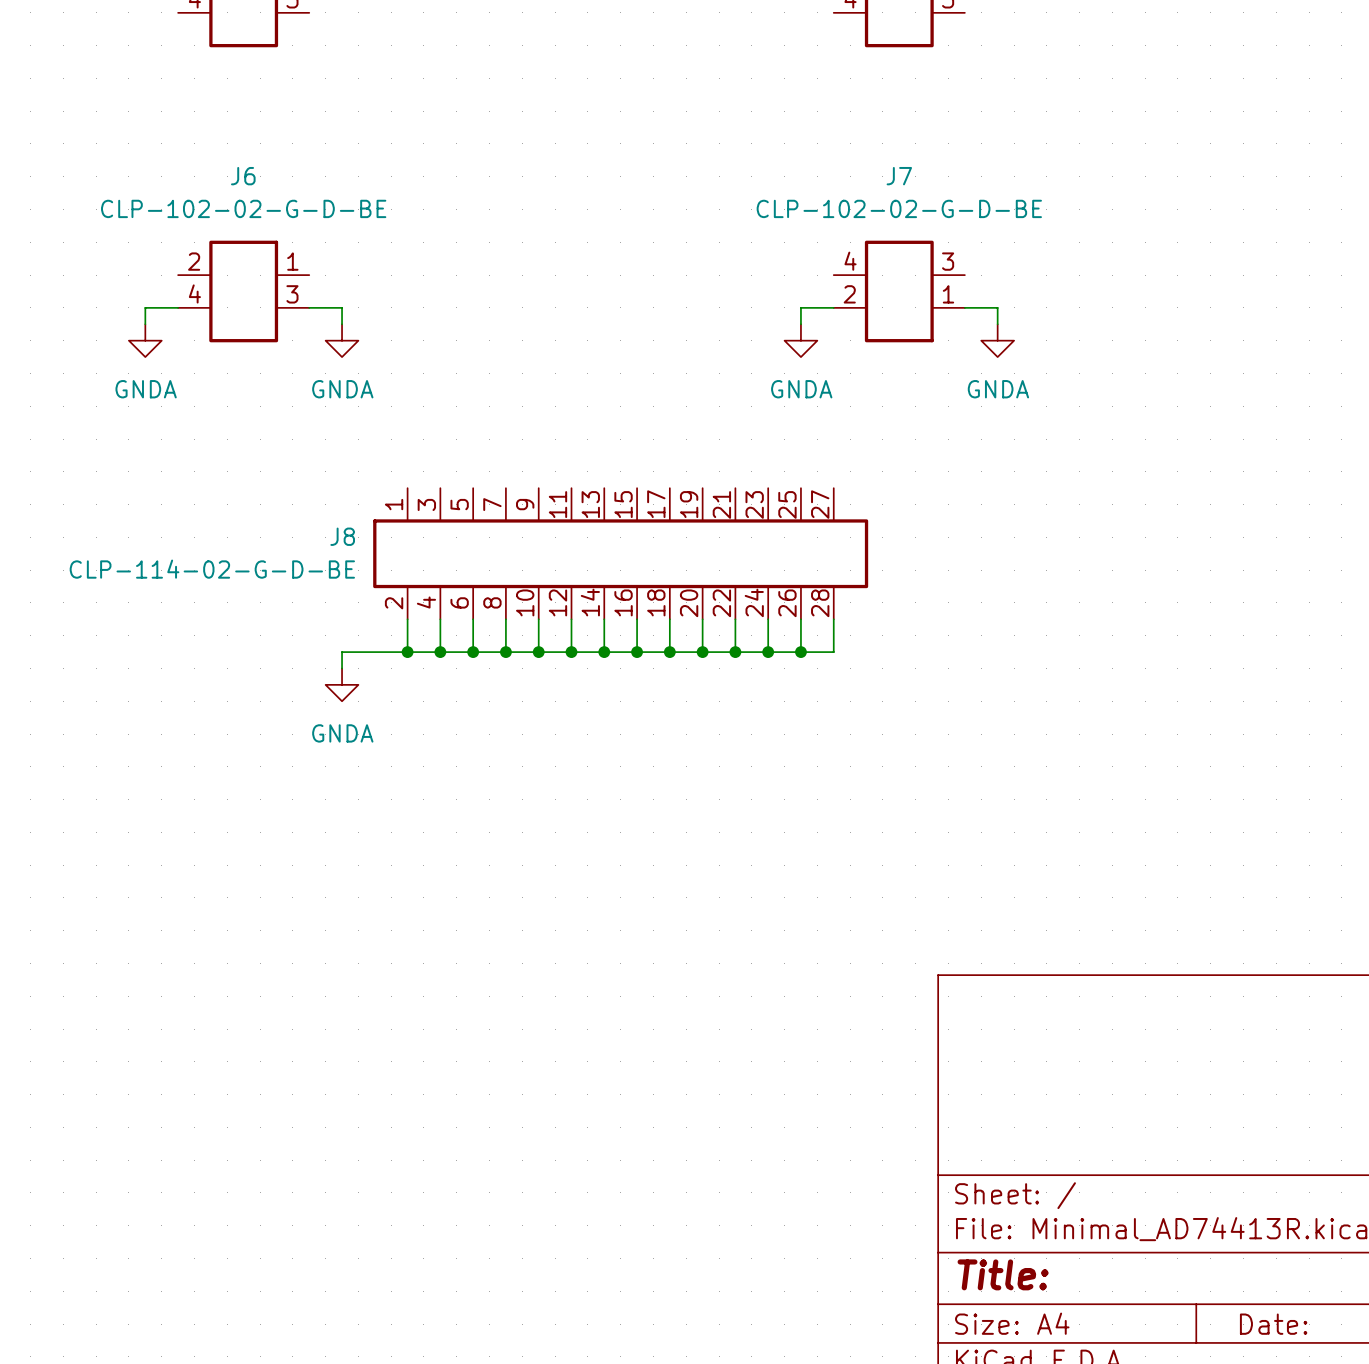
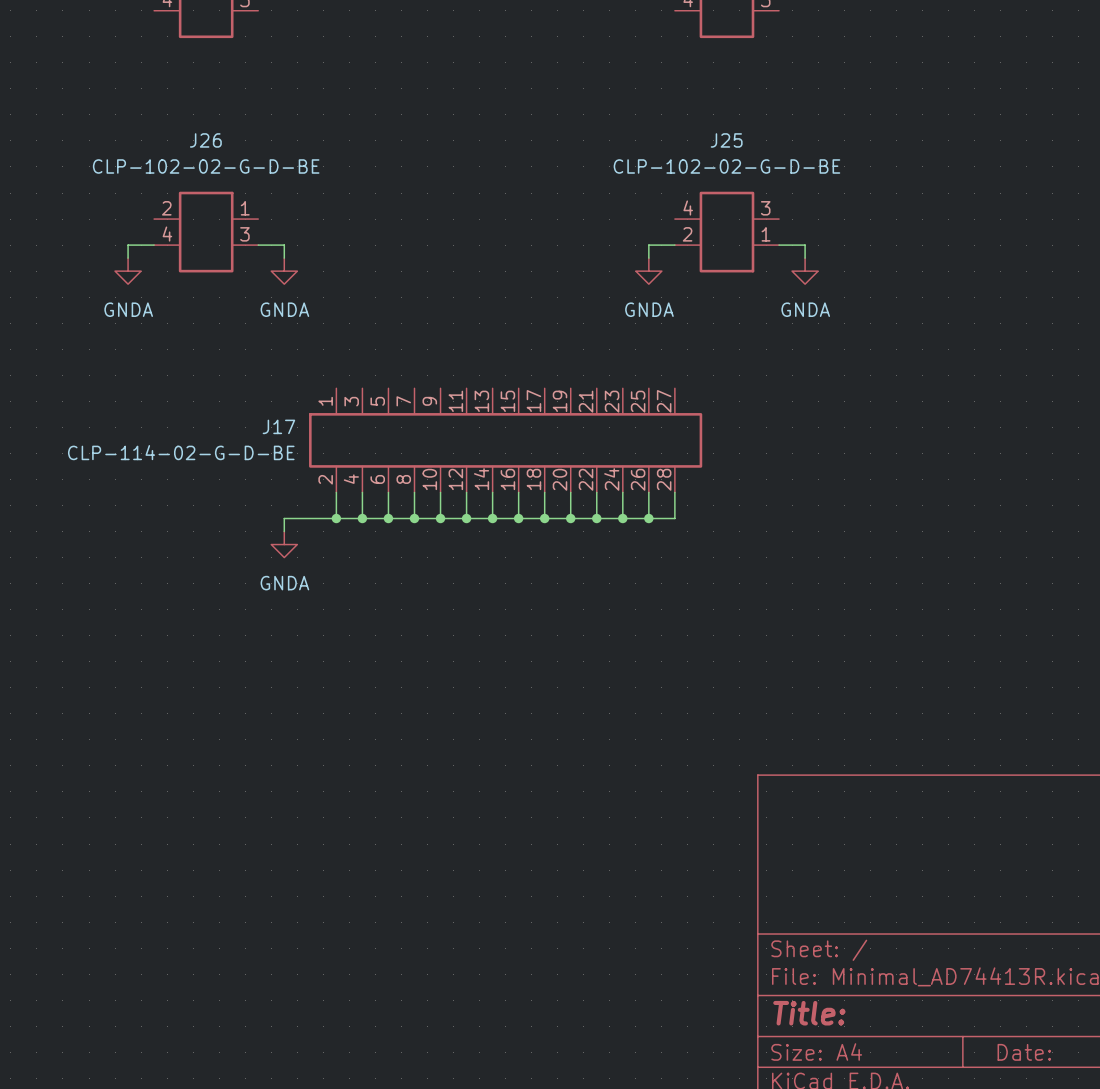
J6 name: J6 (243, 176) -> J26 (205, 140)
J7 name: J7 (899, 176) -> J25 (726, 140)
J8 name: J8 (342, 536) -> J17 (278, 426)

